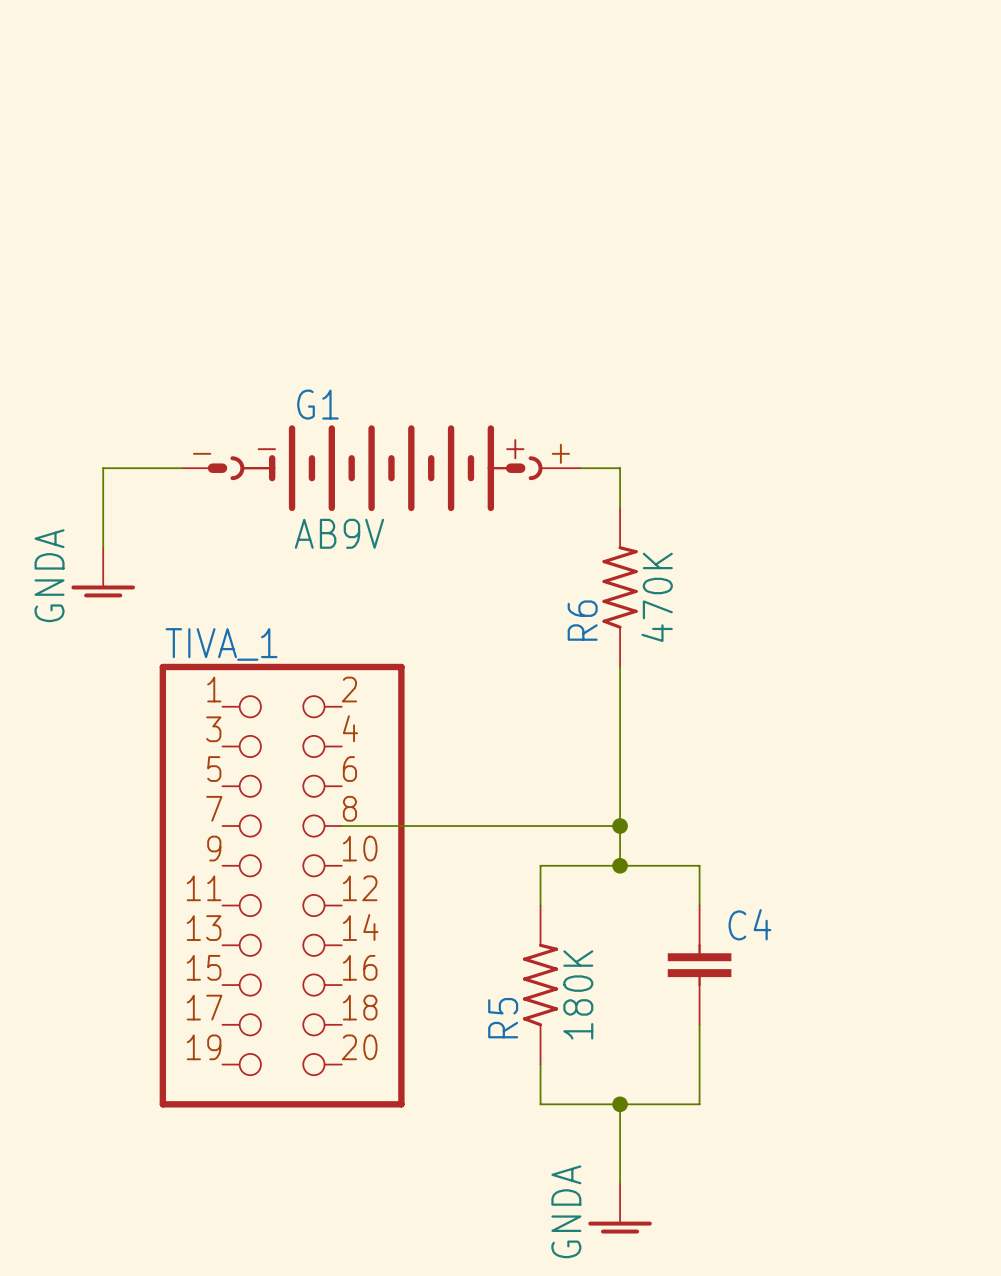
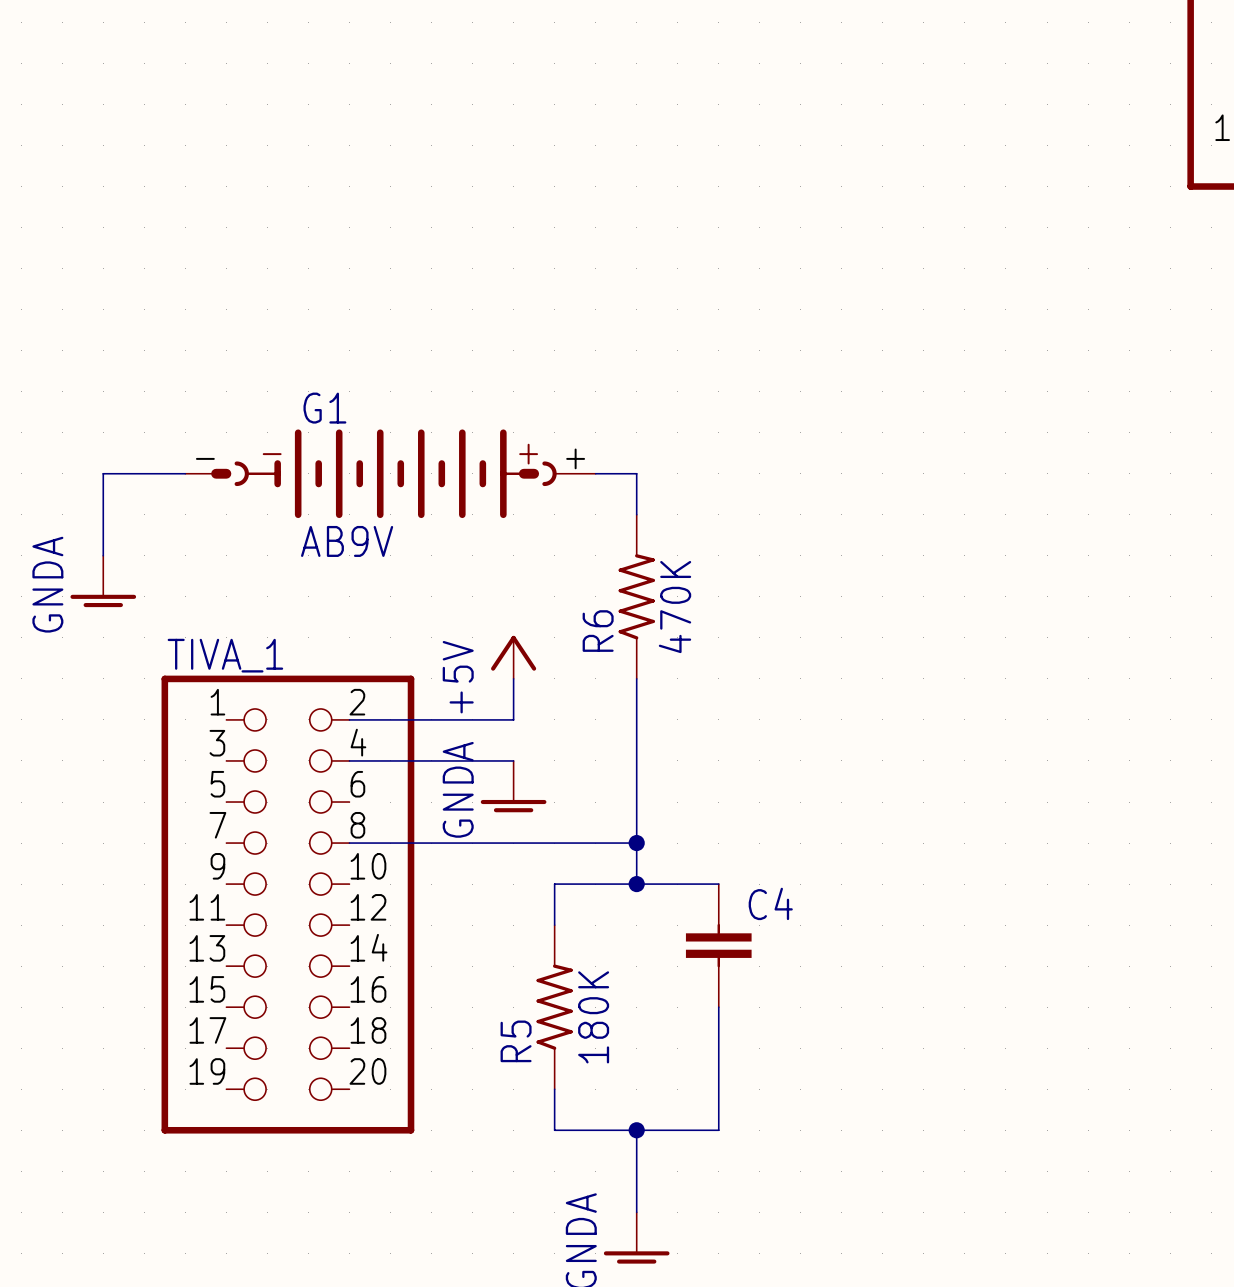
power symbol: none -> +5V (513, 657)
wire: none -> (513, 678) (513, 719) (349, 719)
wire: none -> (349, 760) (513, 760)
power symbol: none -> GNDA (513, 786)
C4 position: (699, 965) -> (718, 945)

